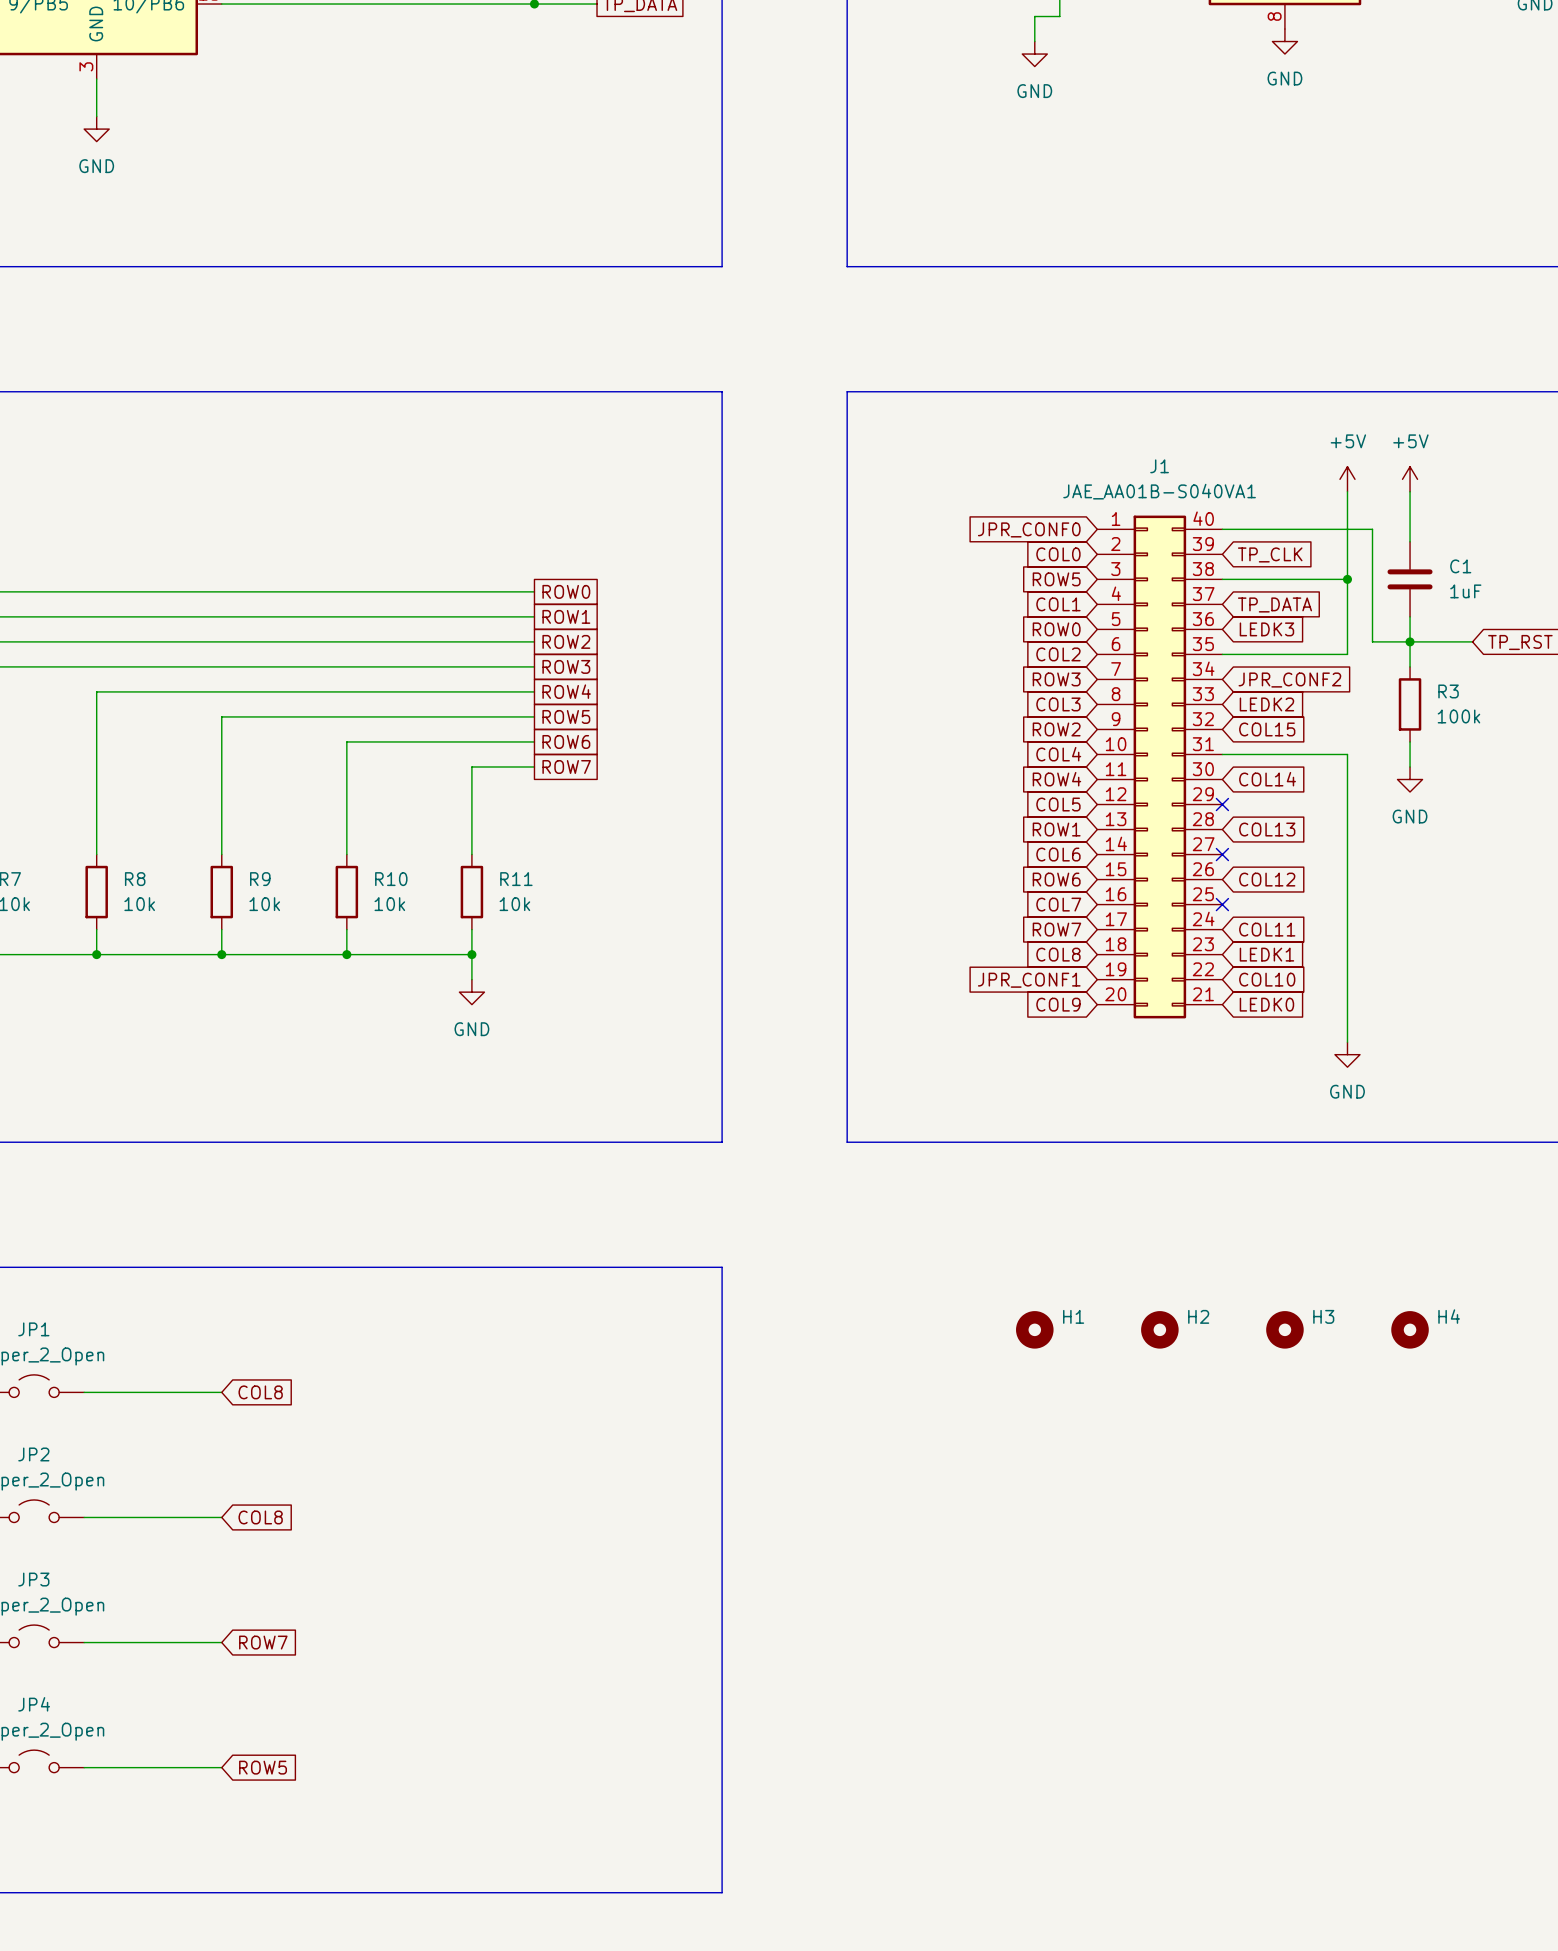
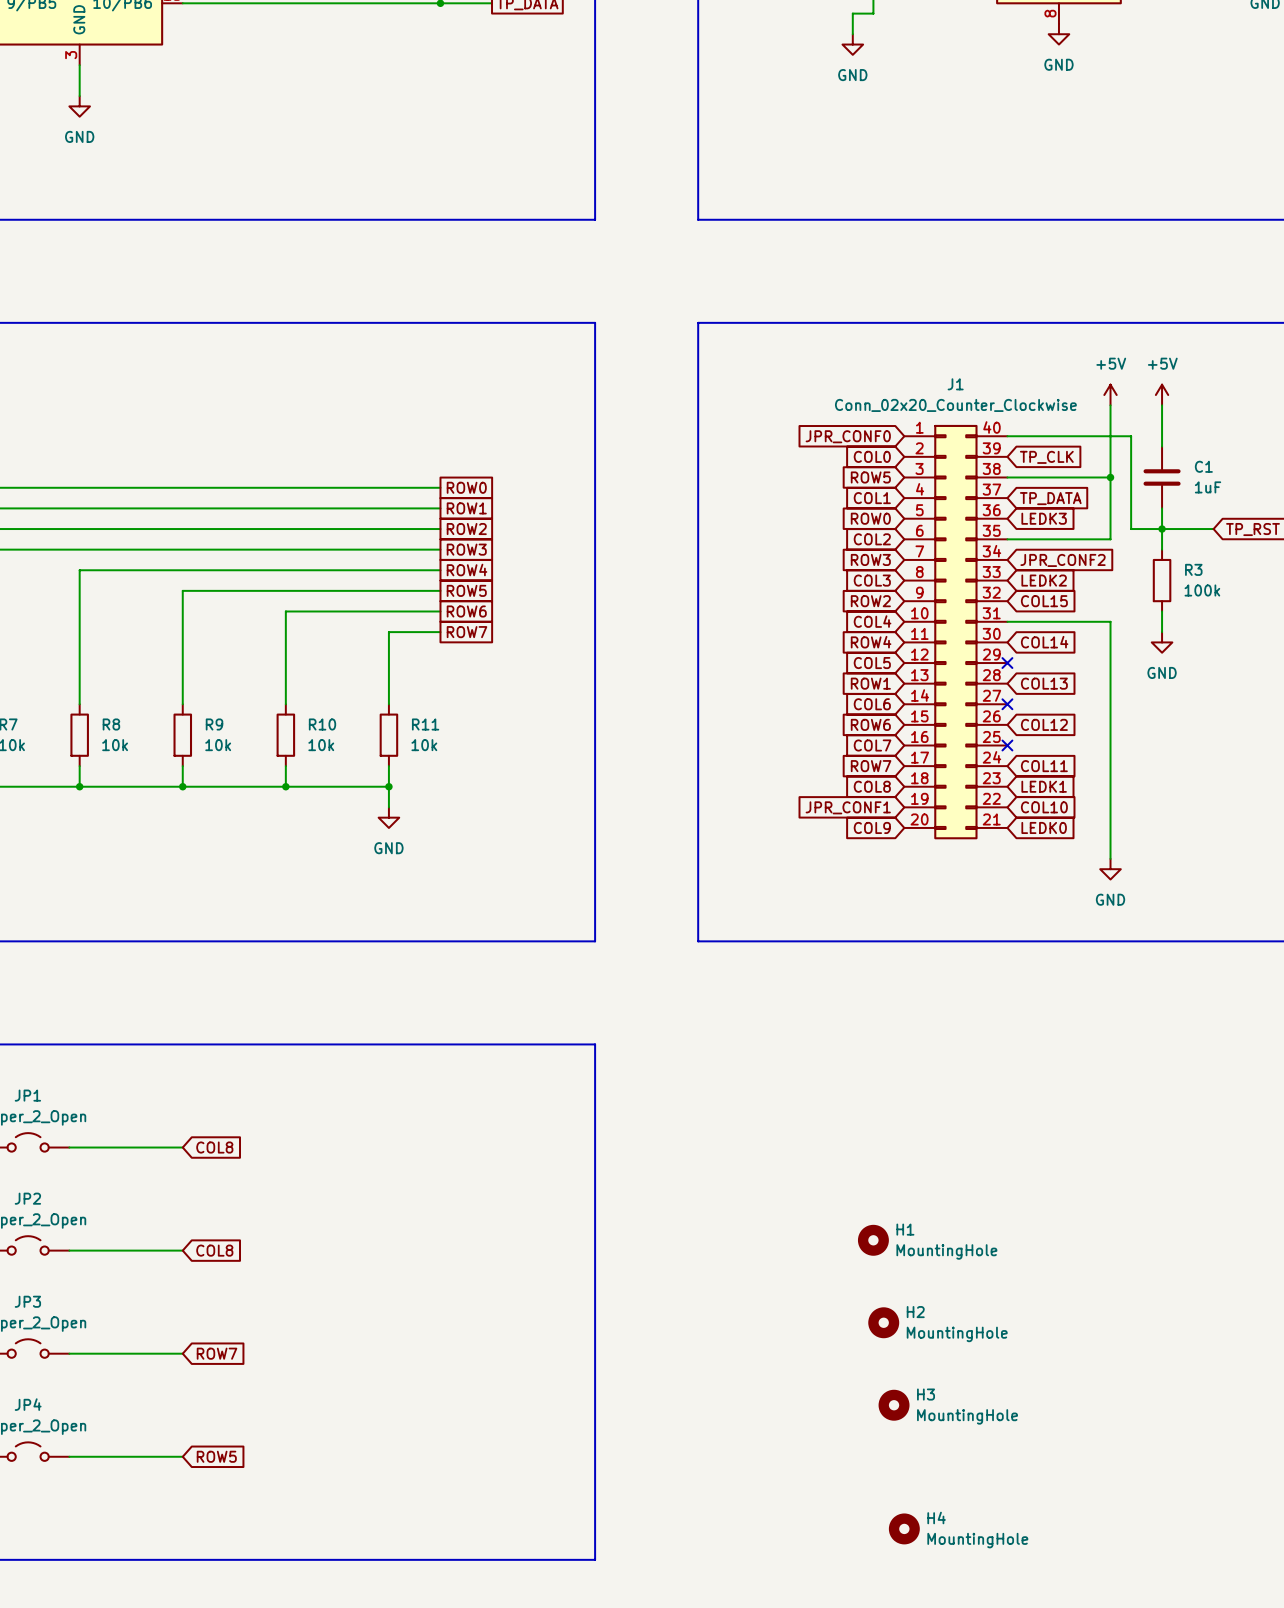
J1 value: JAE_AA01B-S040VA1 (1159, 491) -> Conn_02x20_Counter_Clockwise (955, 405)
H1 position: (1034, 1329) -> (873, 1240)
H2 position: (1159, 1329) -> (883, 1322)
H3 position: (1284, 1329) -> (894, 1405)
H4 position: (1410, 1329) -> (904, 1528)
H1 value: none -> MountingHole (946, 1251)
H2 value: none -> MountingHole (957, 1334)
H3 value: none -> MountingHole (967, 1416)
H4 value: none -> MountingHole (977, 1540)

